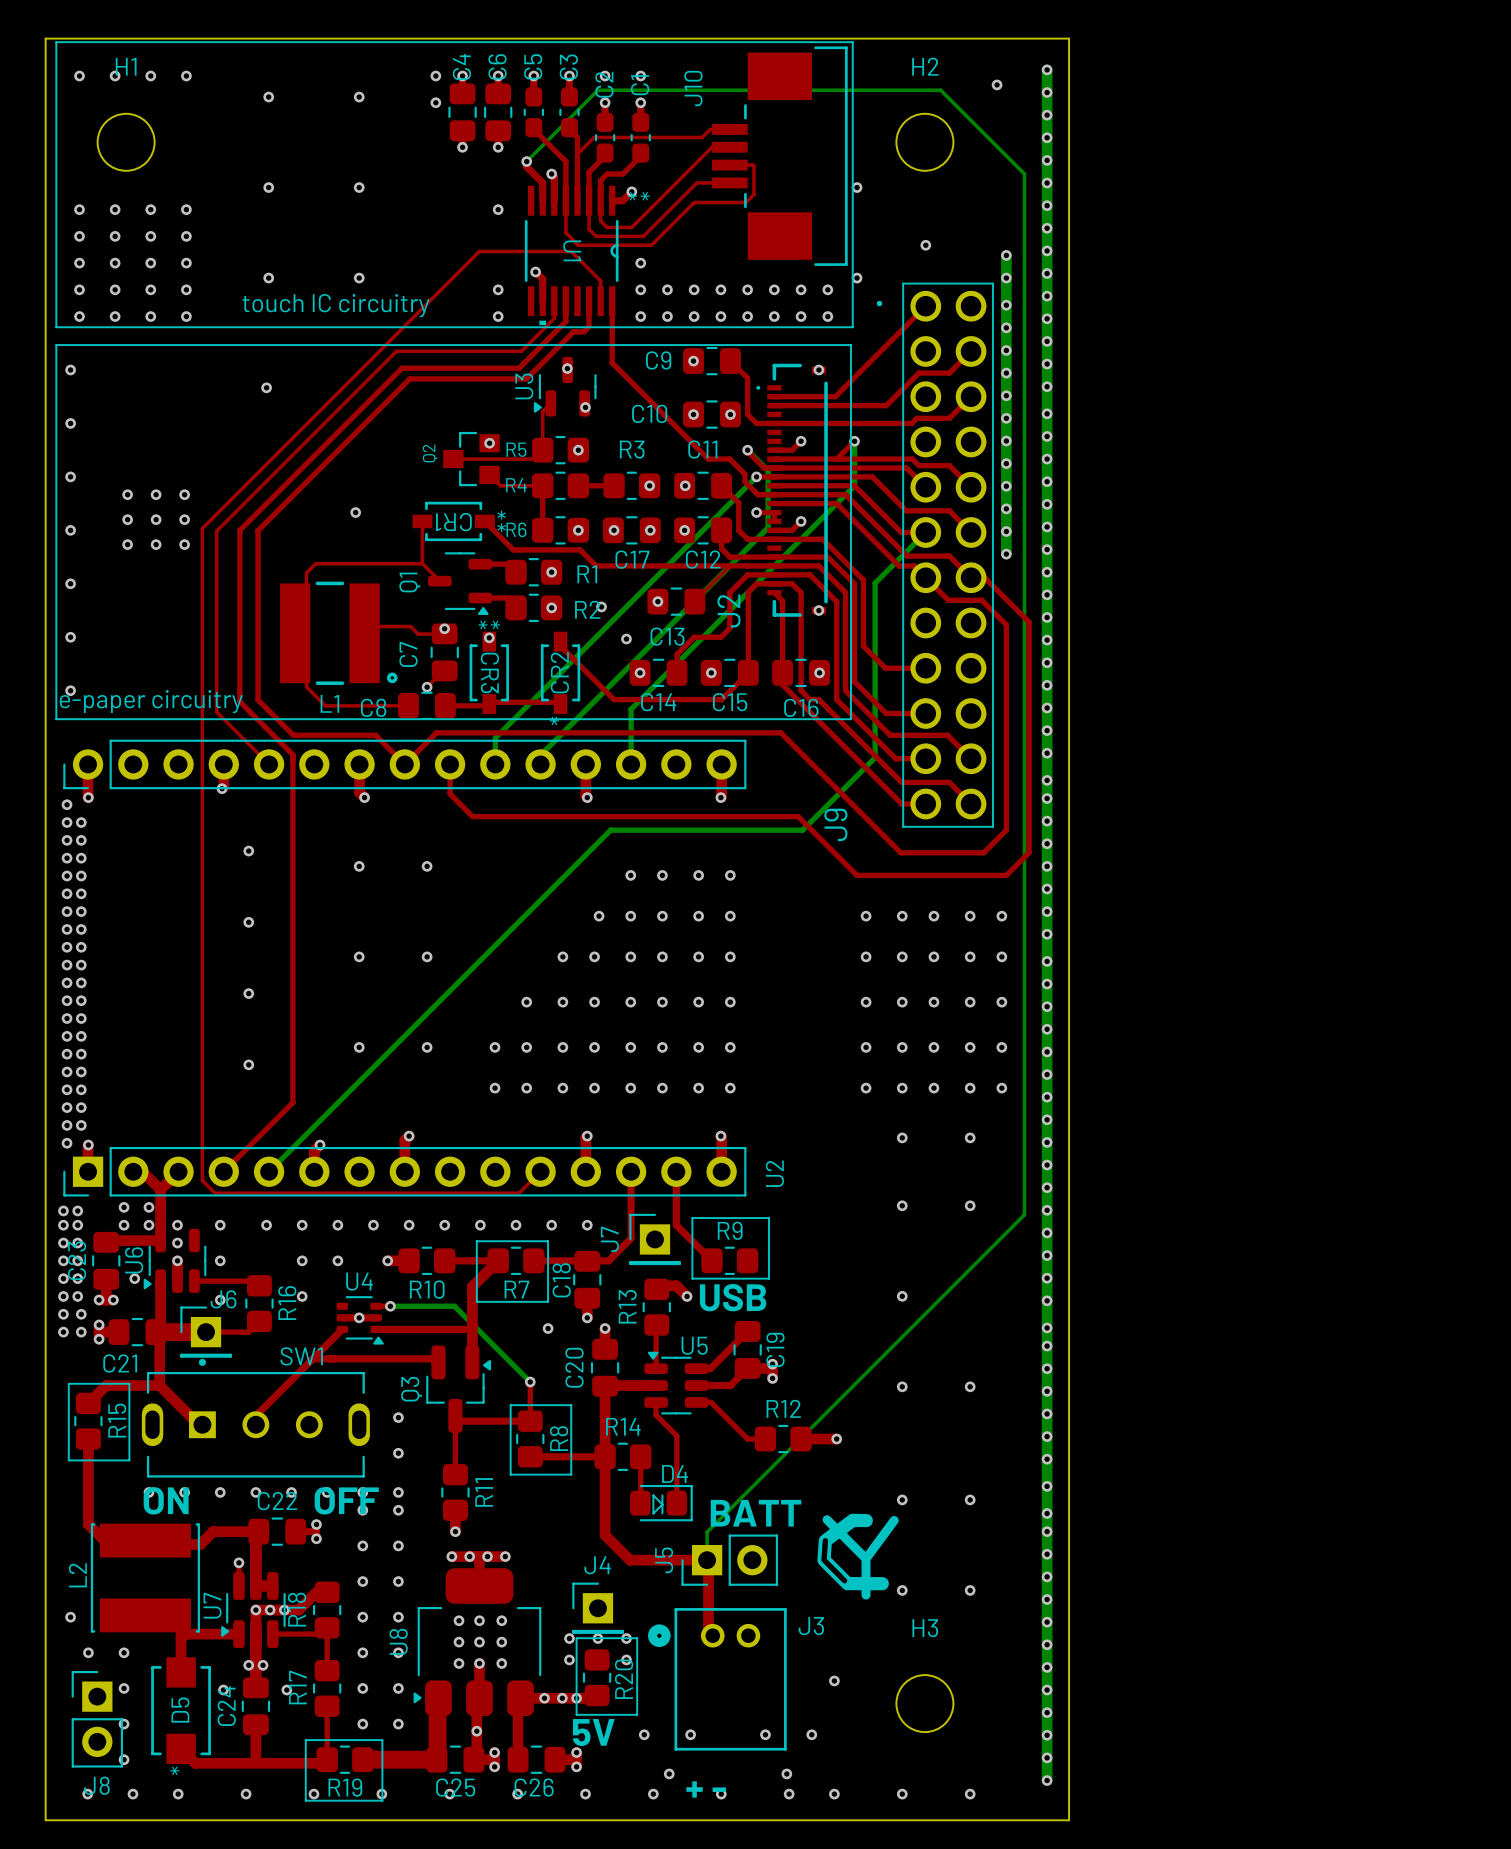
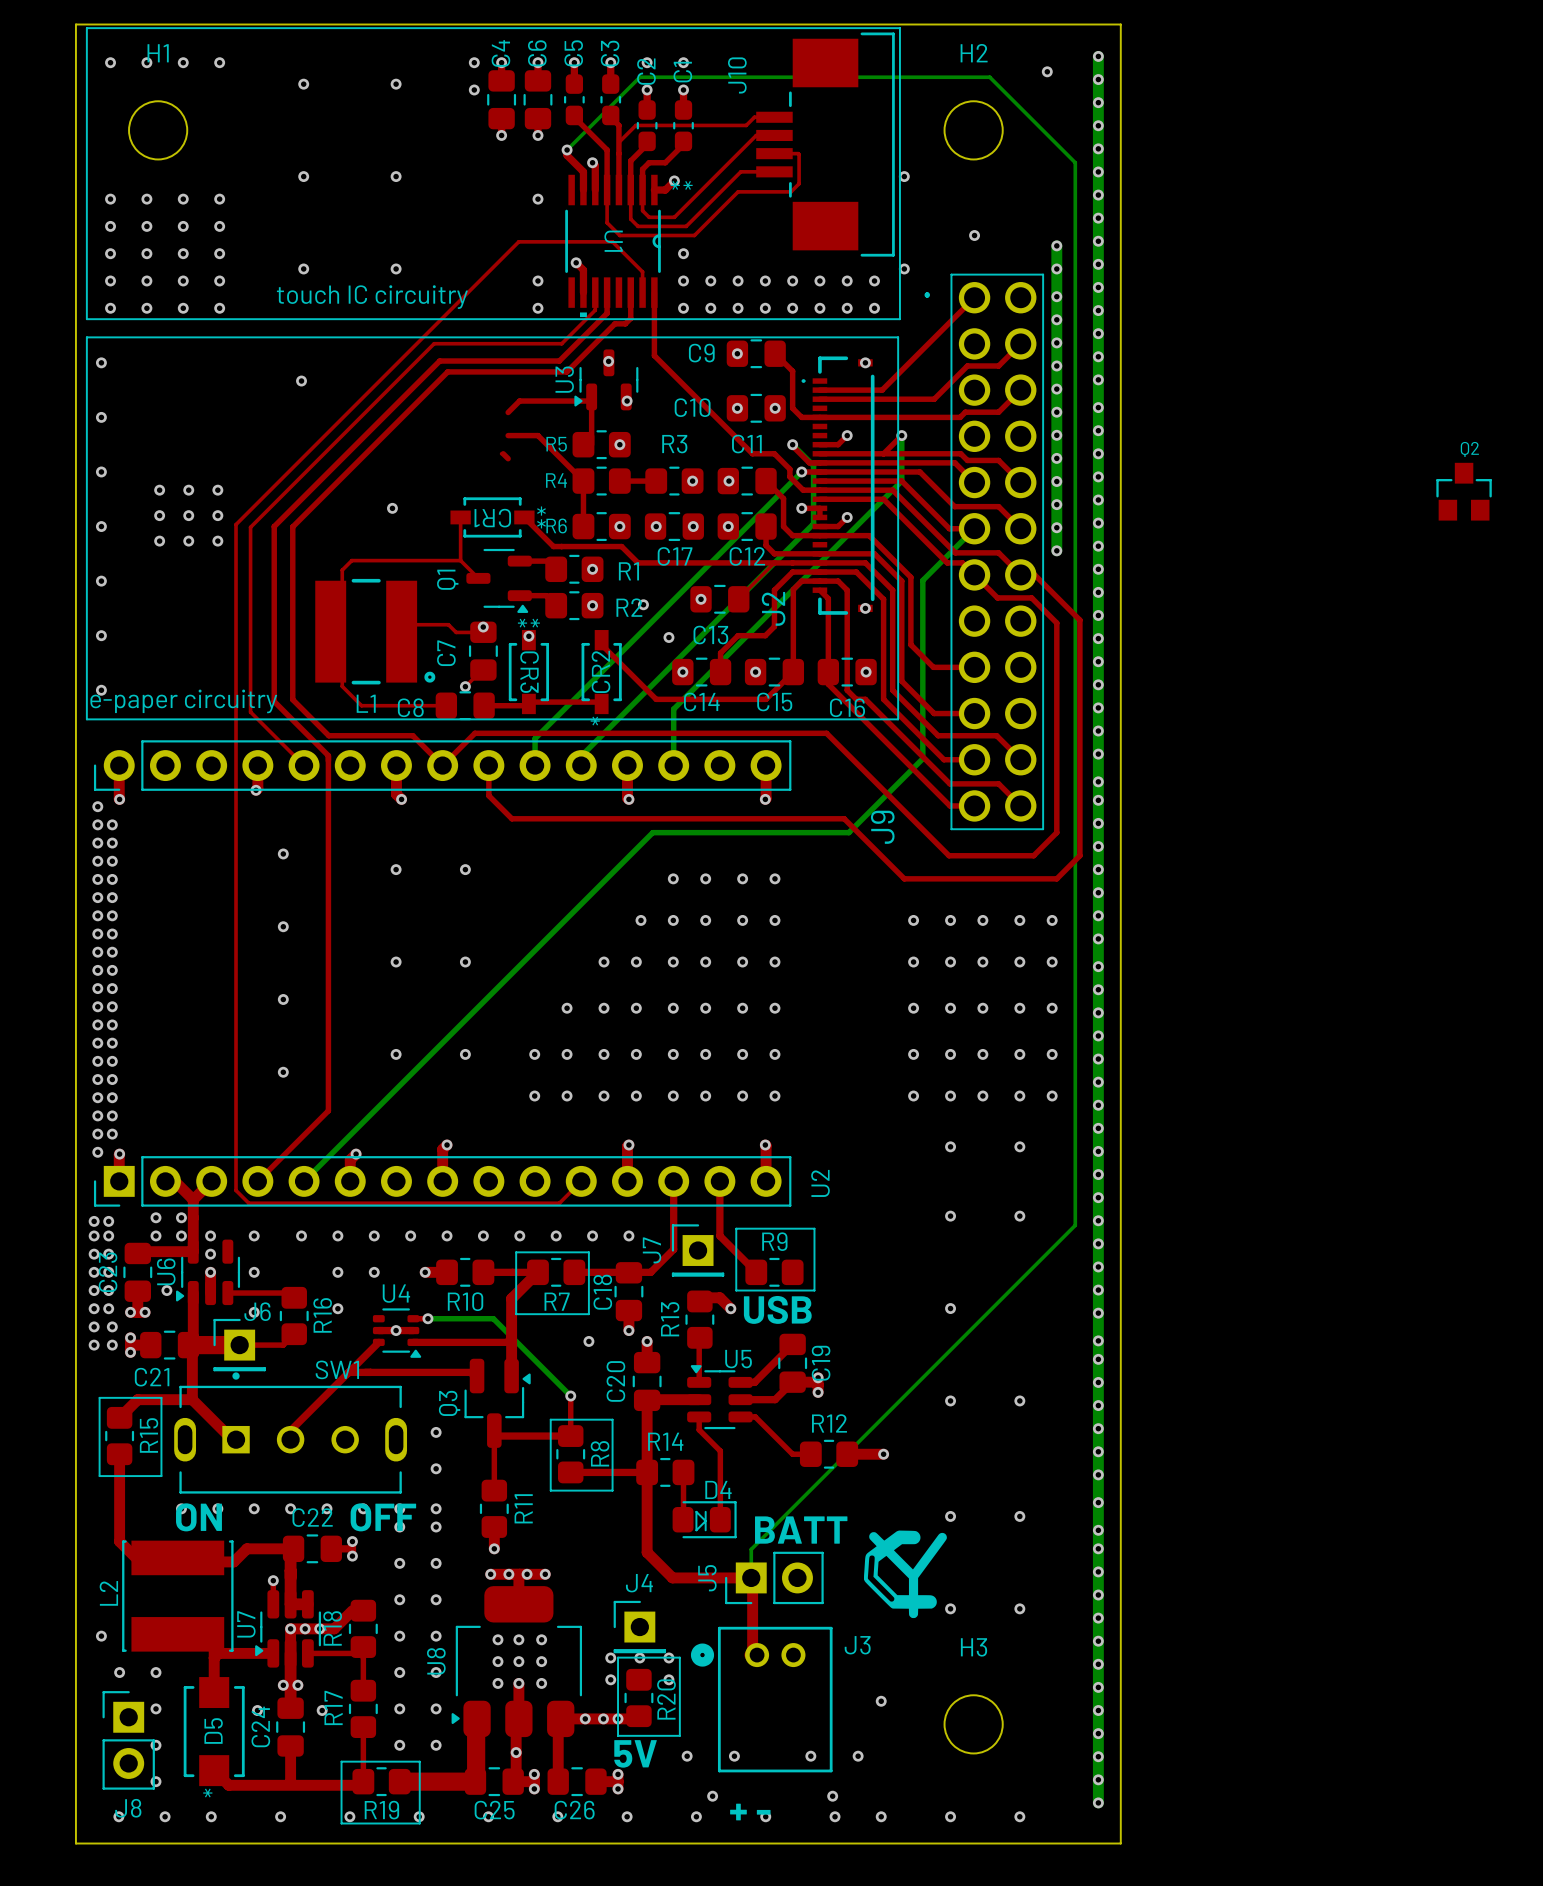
top track: (550, 403) (542, 411) (542, 450) (533, 459) (464, 459) -> (508, 458) (503, 453)
top track: none -> (508, 412) (519, 401) (592, 401) (591, 444)
via: (489, 443) -> none
Q2 rotation: 0° (471, 459) -> 90° clockwise (1464, 491)
Q2 position: (471, 459) -> (1464, 491)
top track: (489, 474) (500, 485) (542, 485) -> (508, 435) (537, 435) (583, 481)

